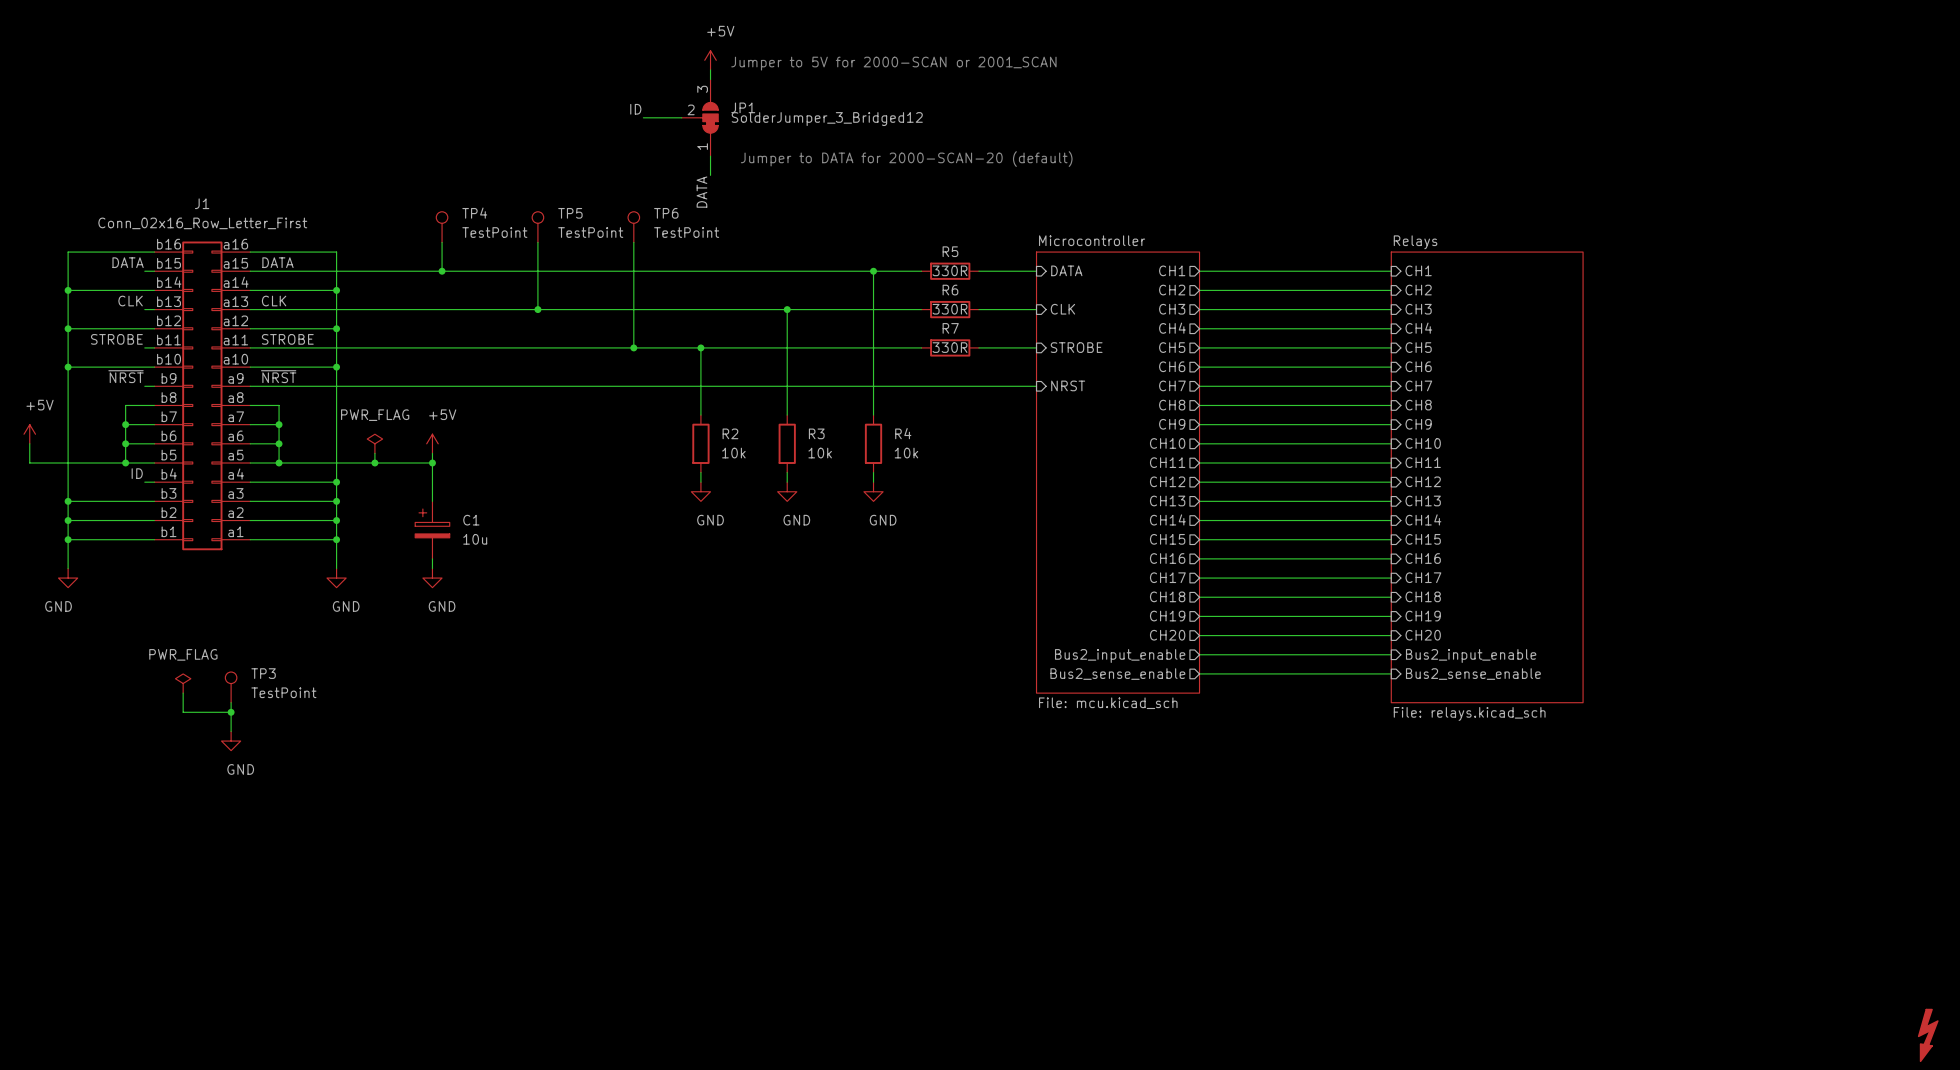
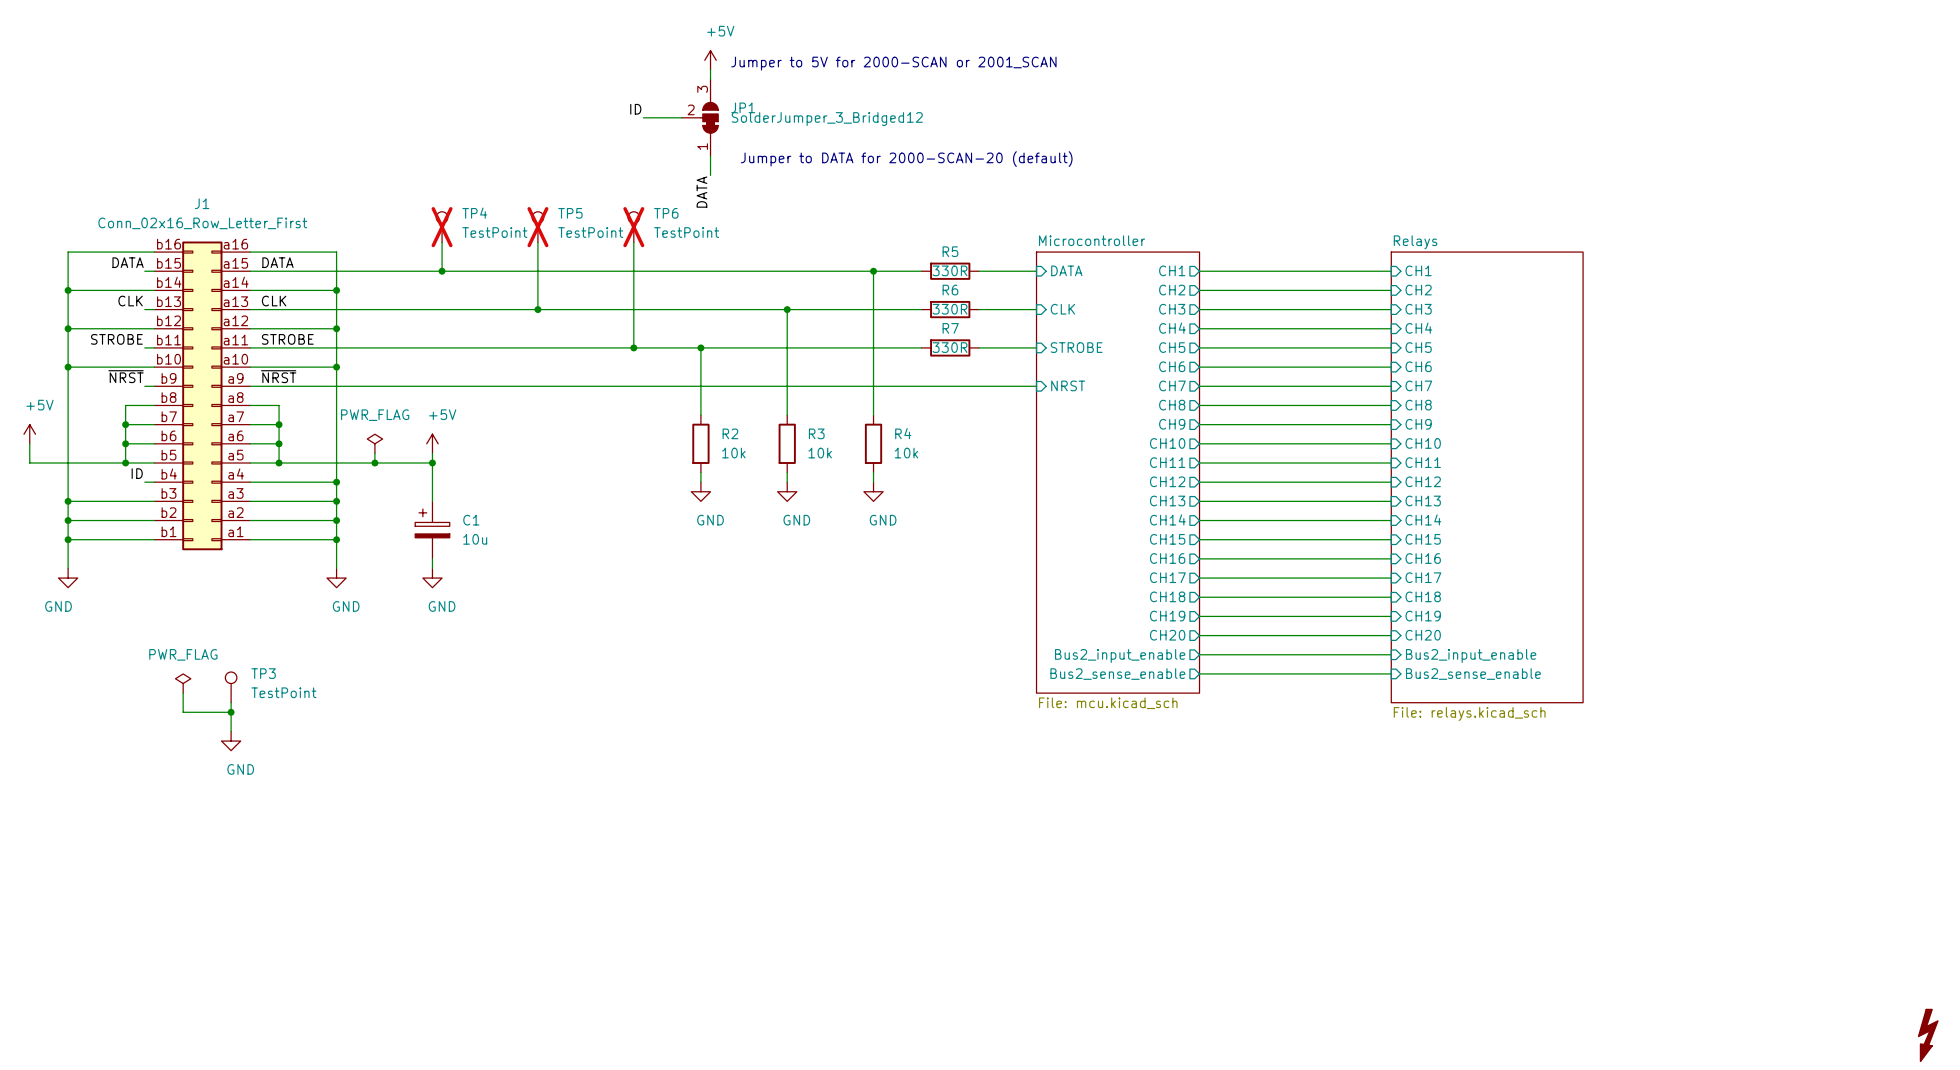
TP4 do-not-place cross: none -> (442, 227)
TP5 do-not-place cross: none -> (537, 227)
TP6 do-not-place cross: none -> (633, 227)

